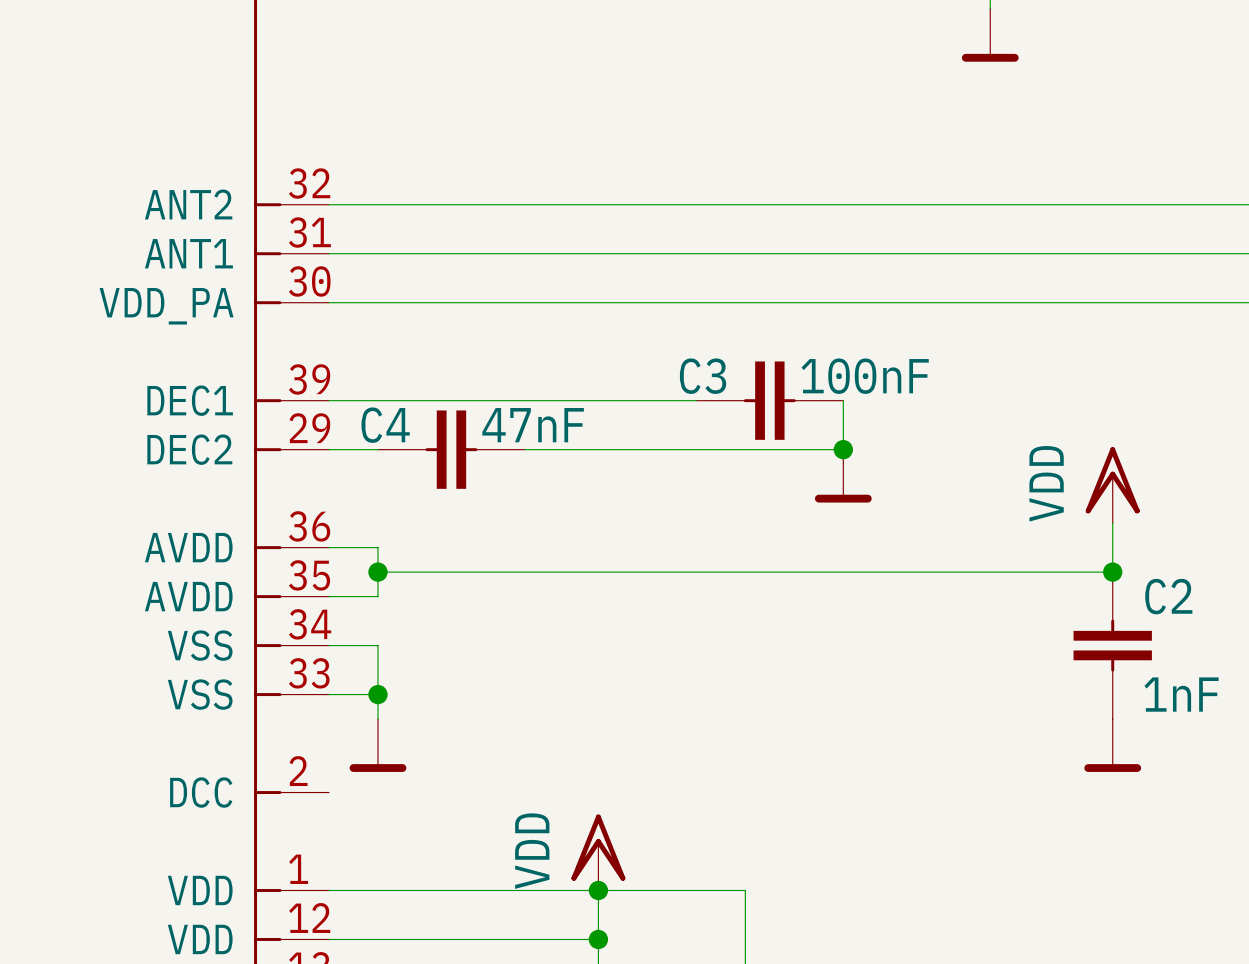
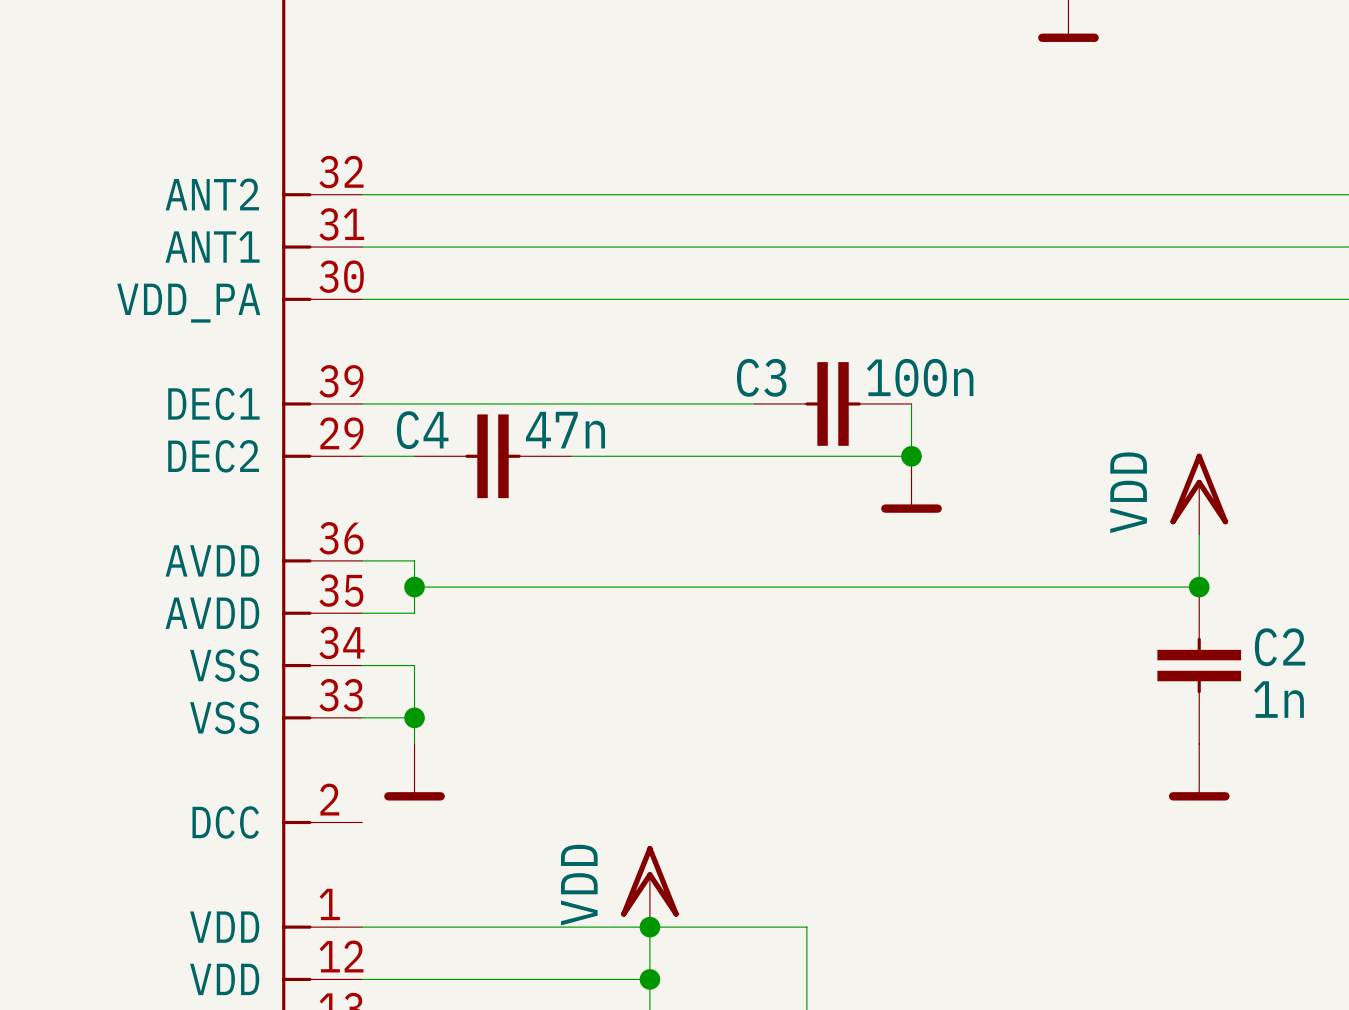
C3 value: 100nF (865, 376) -> 100n (920, 377)
C4 value: 47nF (533, 425) -> 47n (565, 430)
C2 name position: C2 (1168, 596) -> C2 (1280, 647)
C2 value: 1nF (1181, 694) -> 1n (1278, 699)

